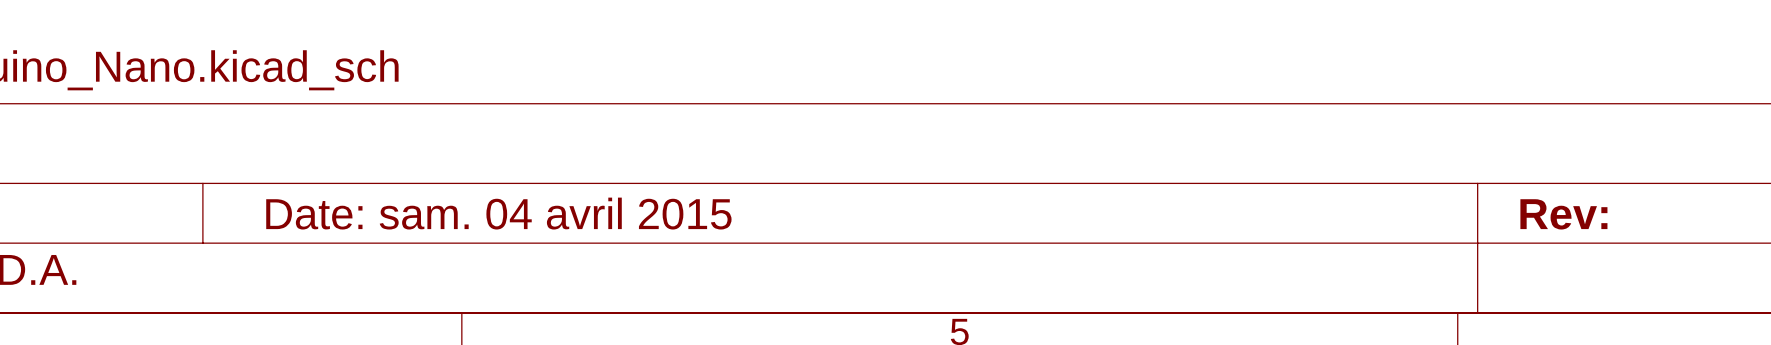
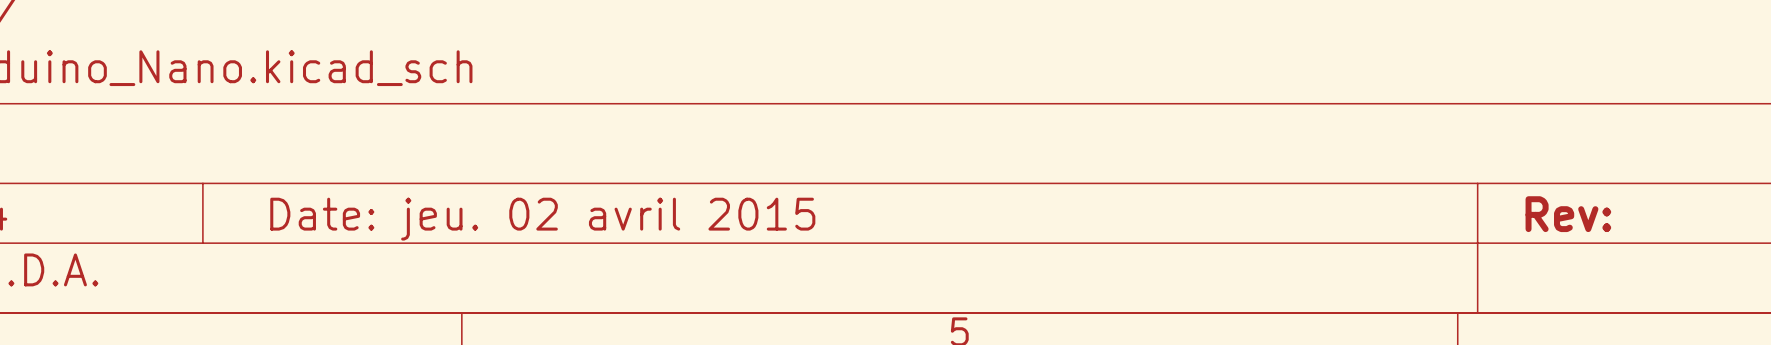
title block: Date: sam. 04 avril 2015 (498, 213) -> Date: jeu. 02 avril 2015 (542, 219)

